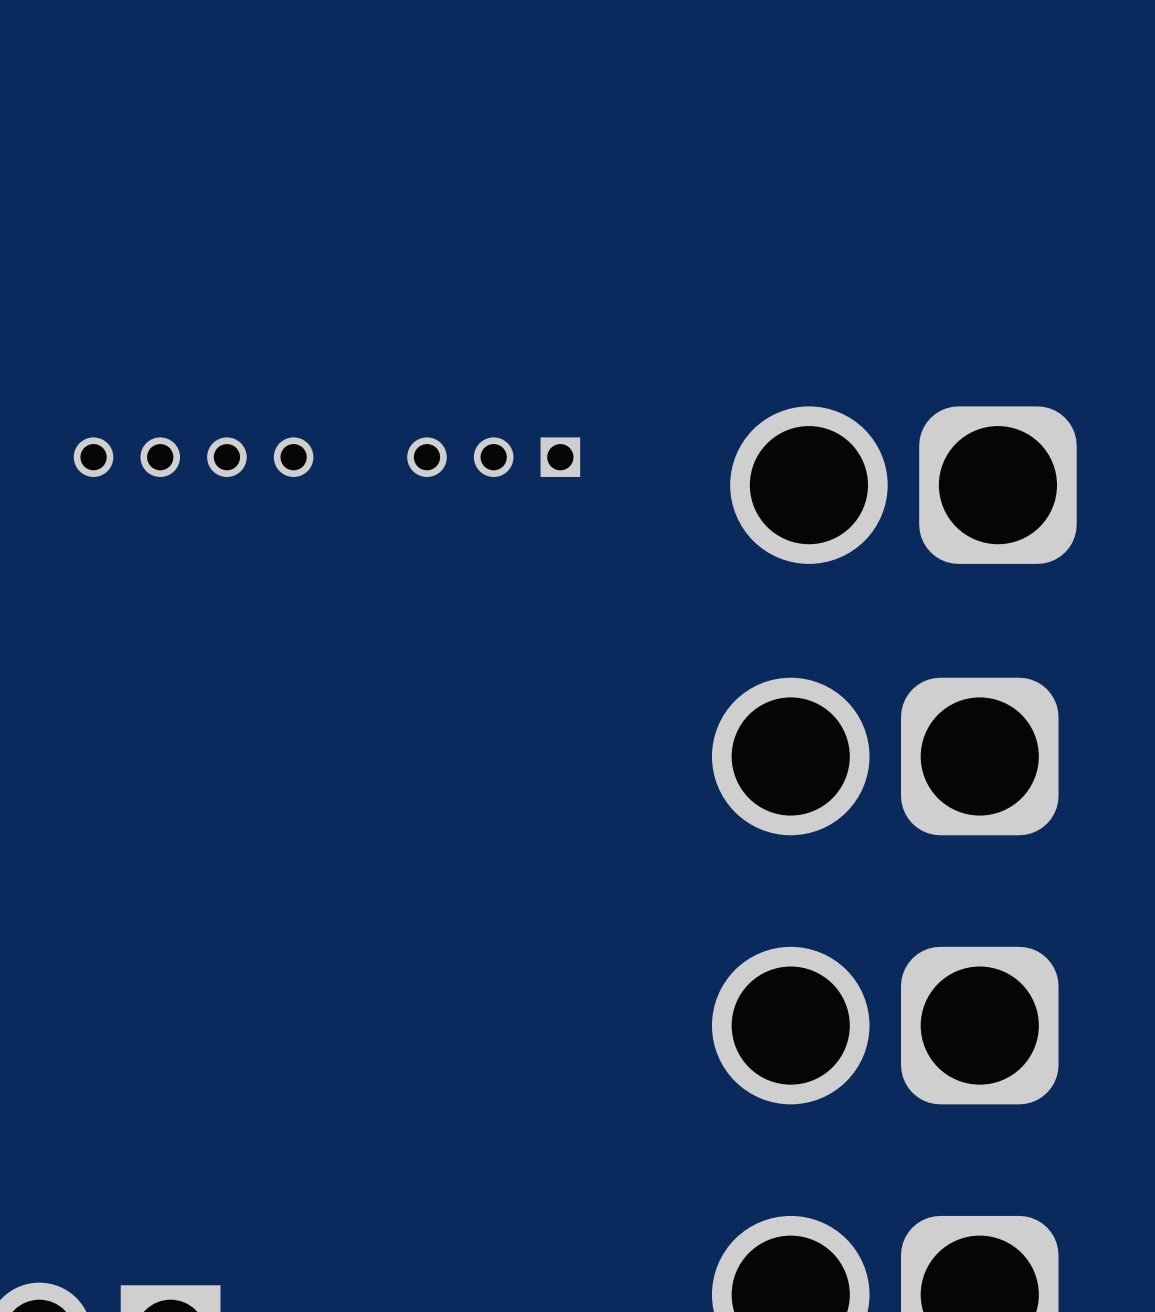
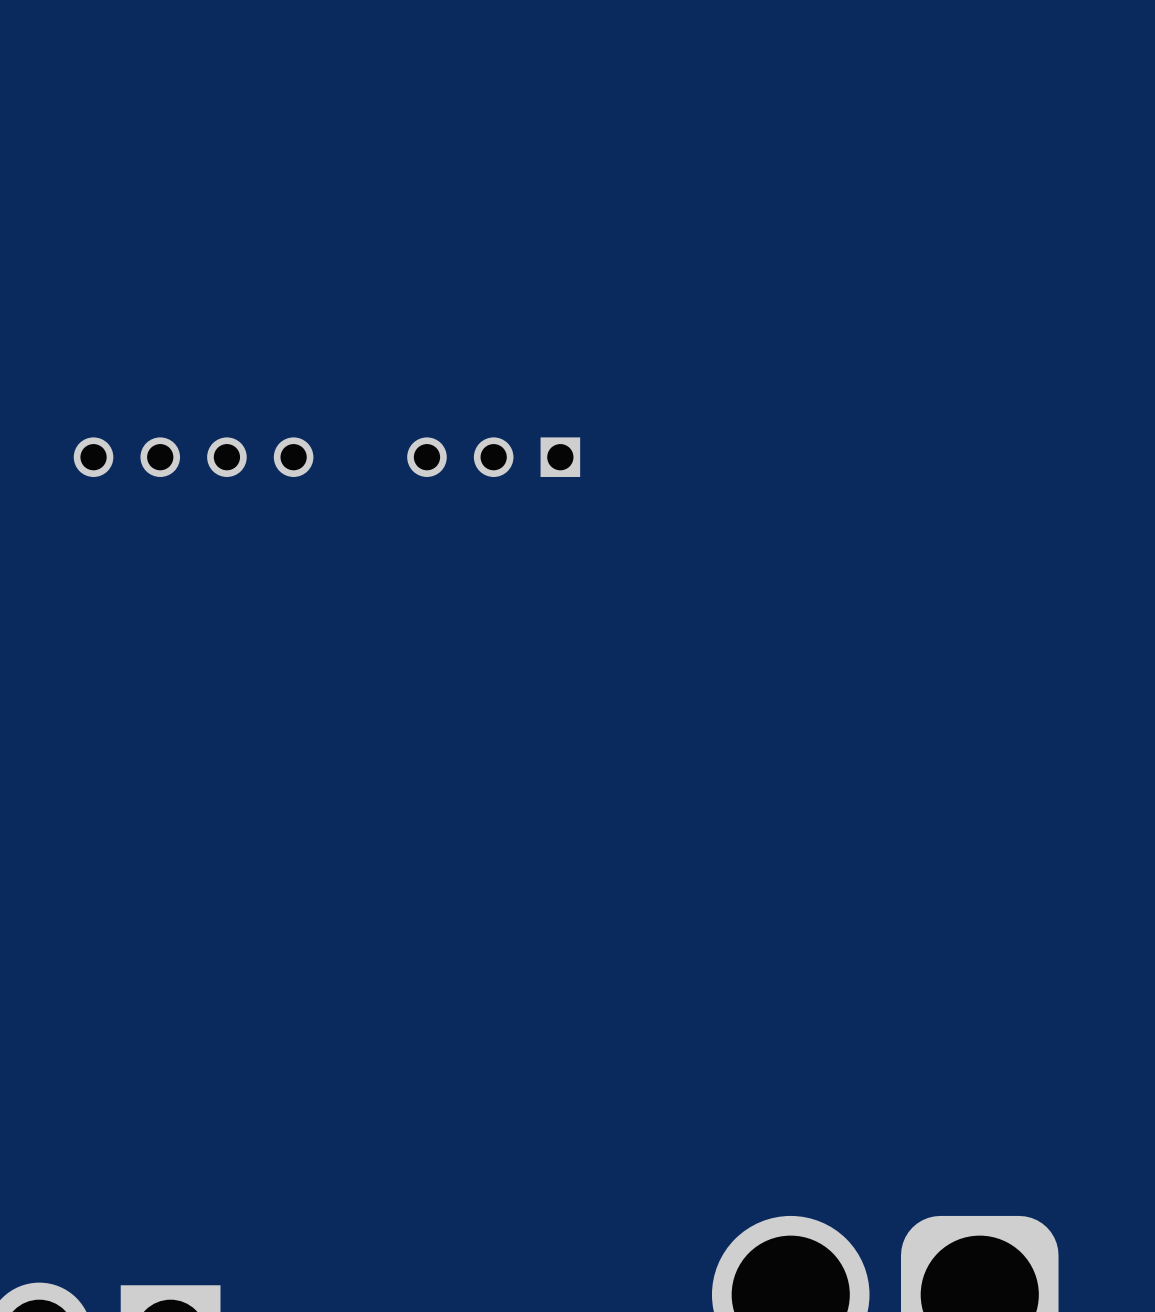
part: (903, 485) -> none
part: (885, 756) -> none
part: (885, 1025) -> none

